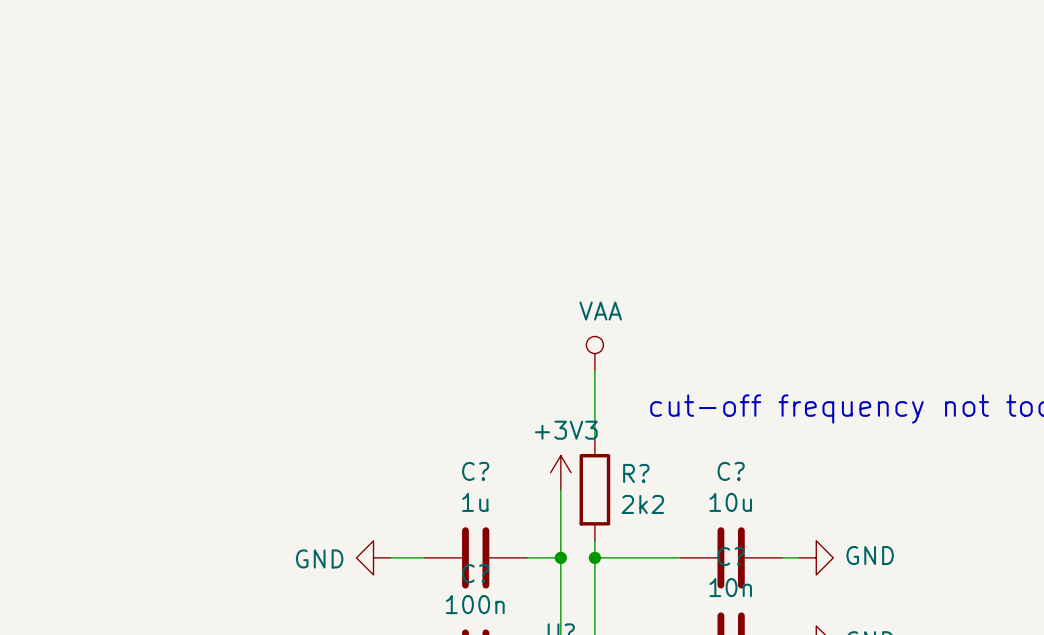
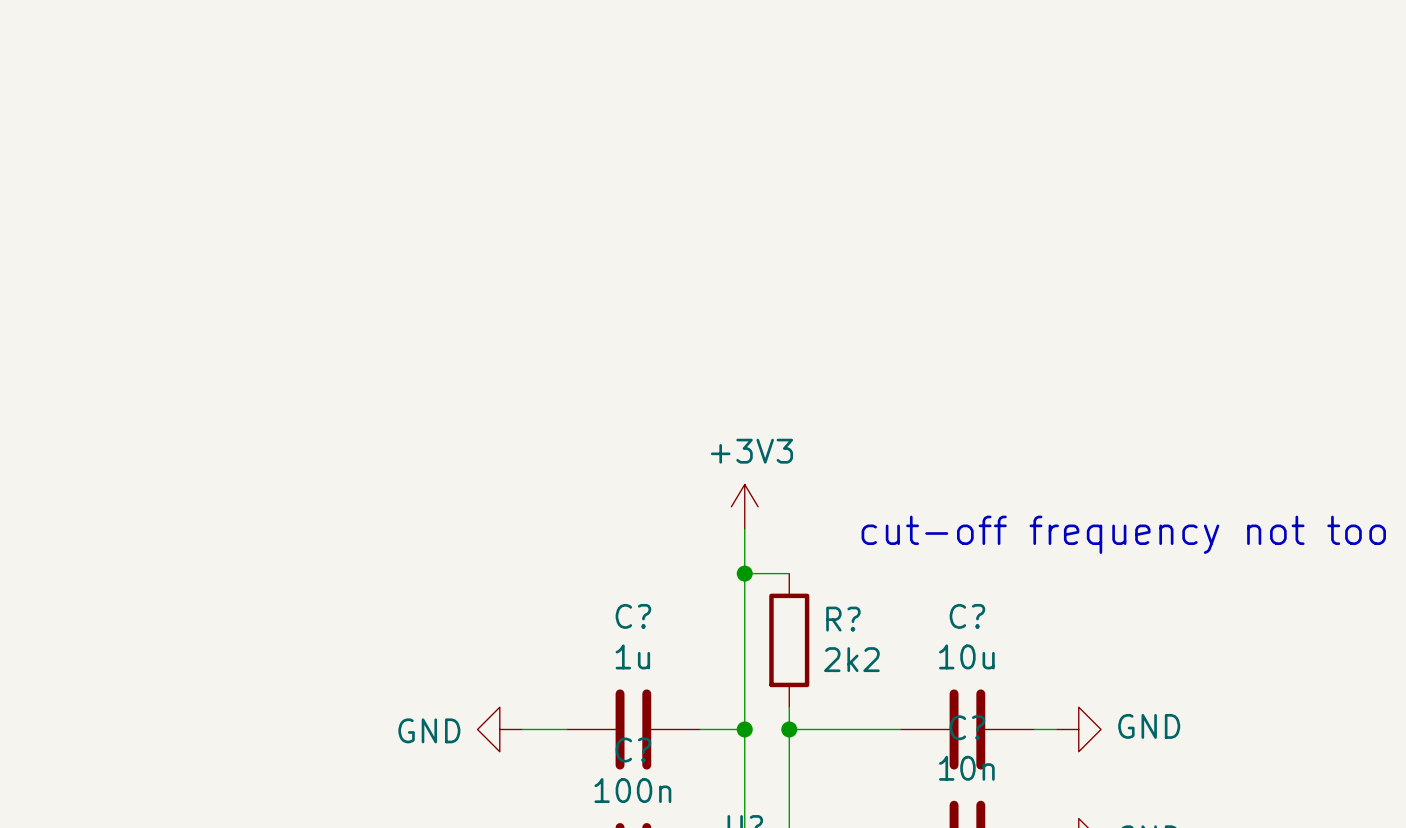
power symbol: VAA (594, 353) -> none
wire: (594, 370) (594, 438) -> (744, 573) (789, 573)
wire: none -> (744, 529) (744, 640)
junction: none -> (744, 573)
power symbol position: +3V3 (560, 472) -> +3V3 (744, 506)

